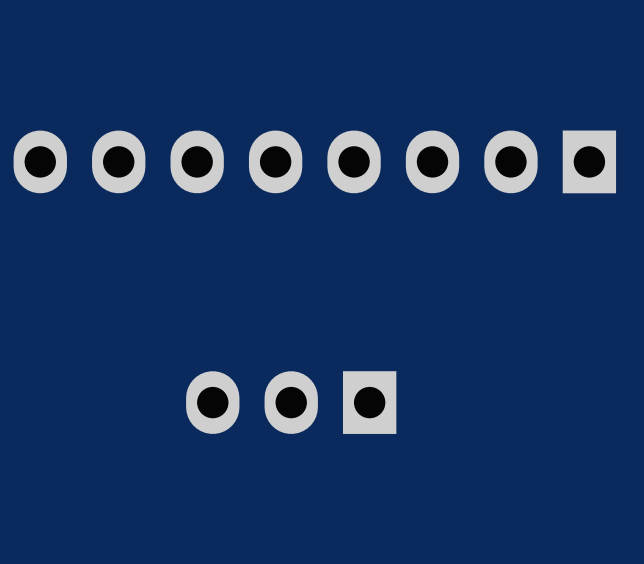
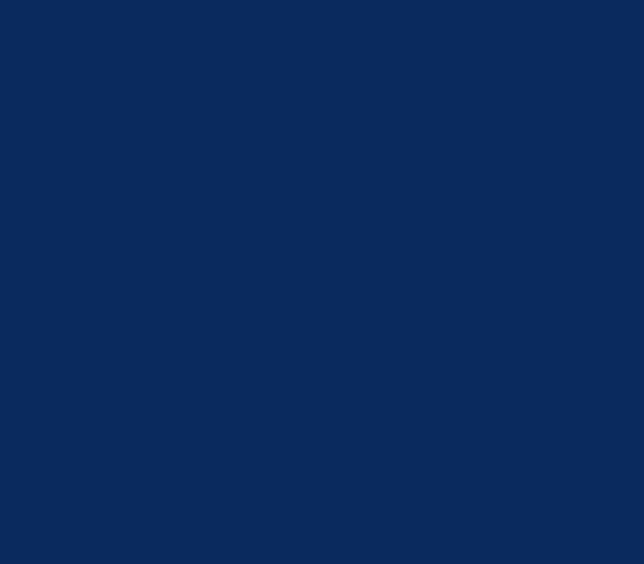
part: (314, 161) -> none
part: (291, 402) -> none

